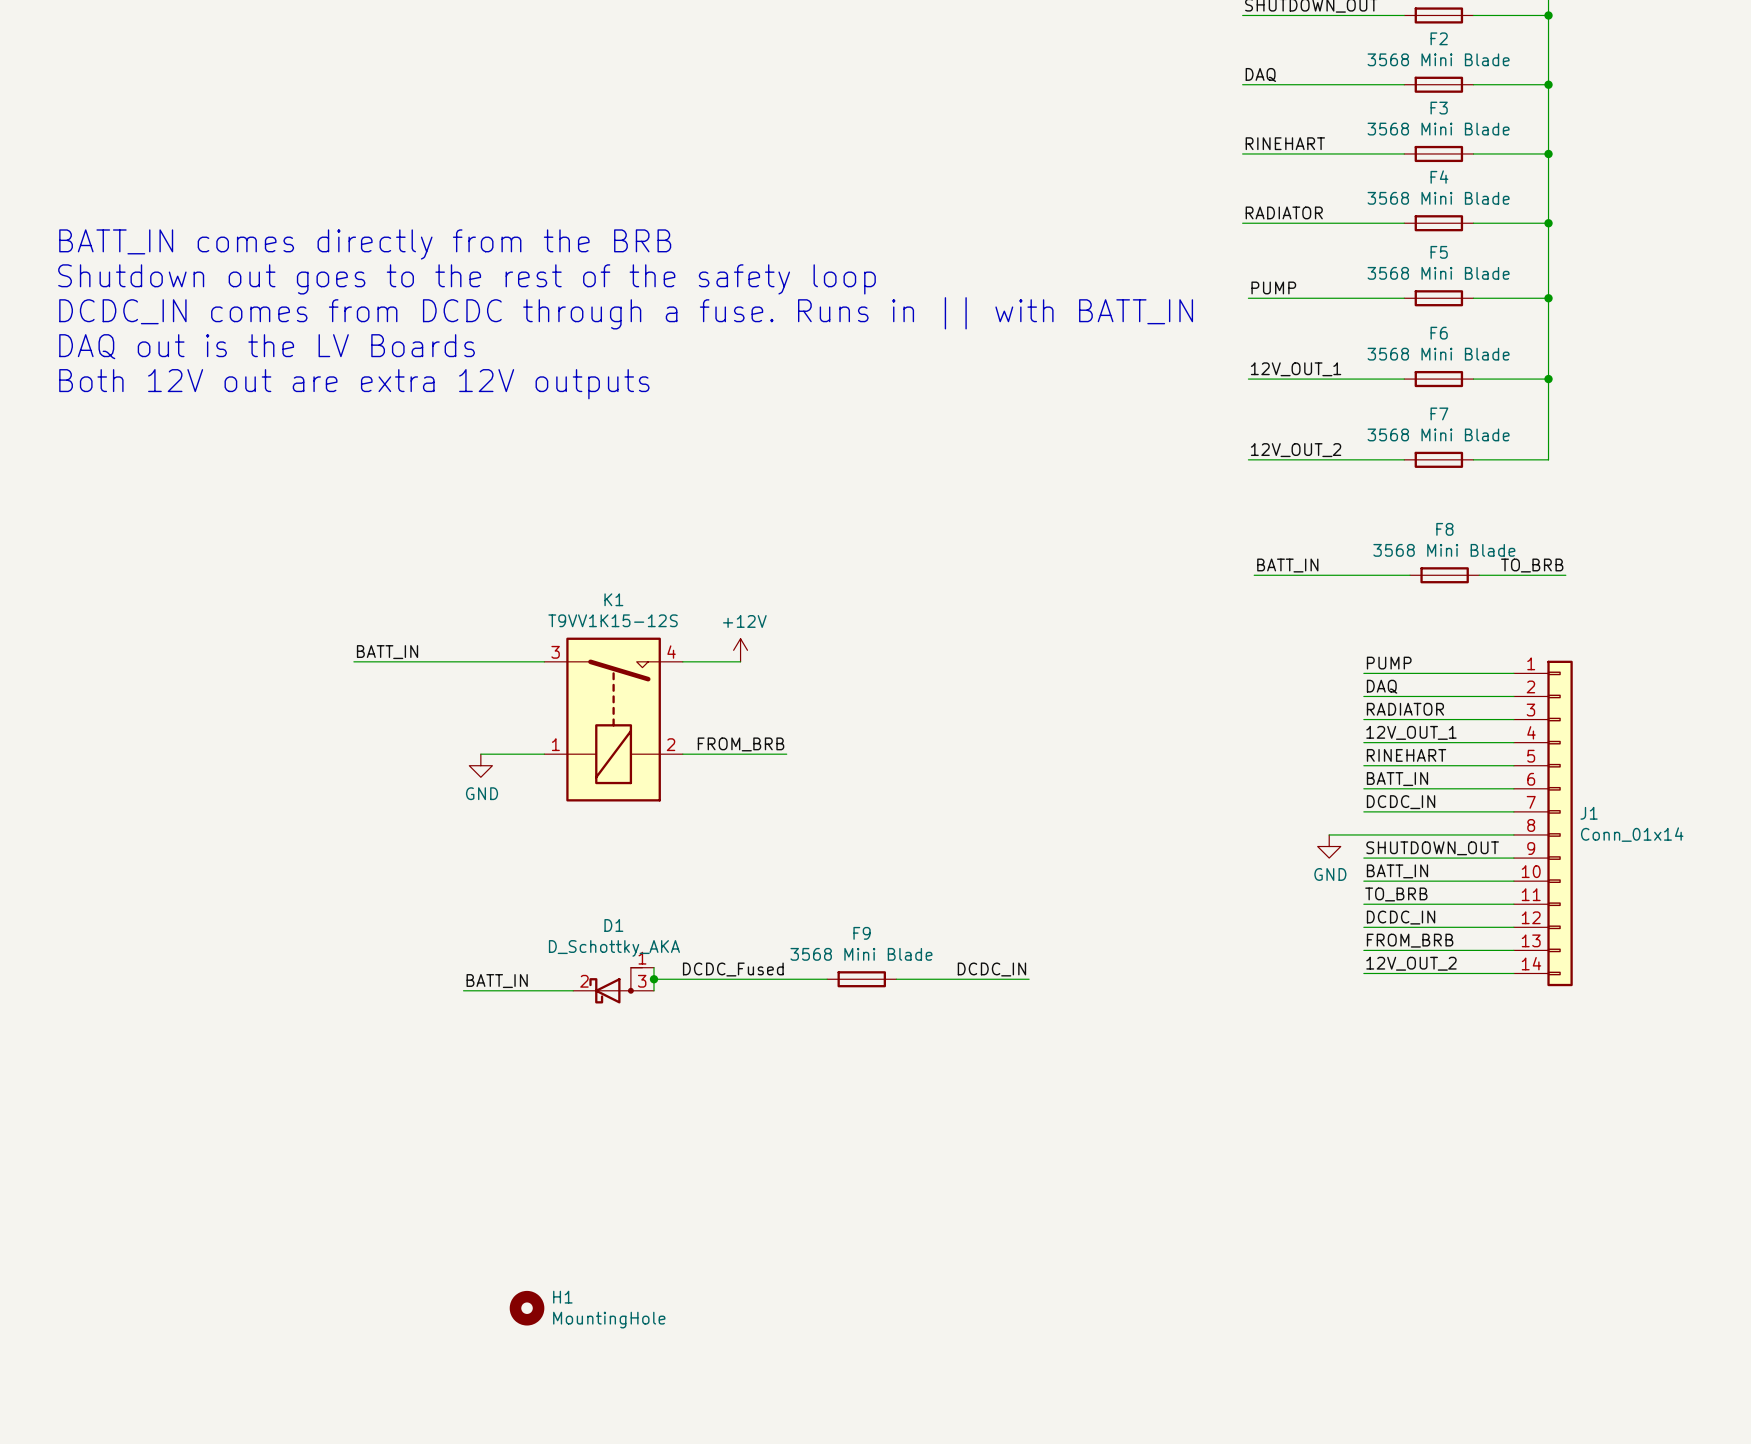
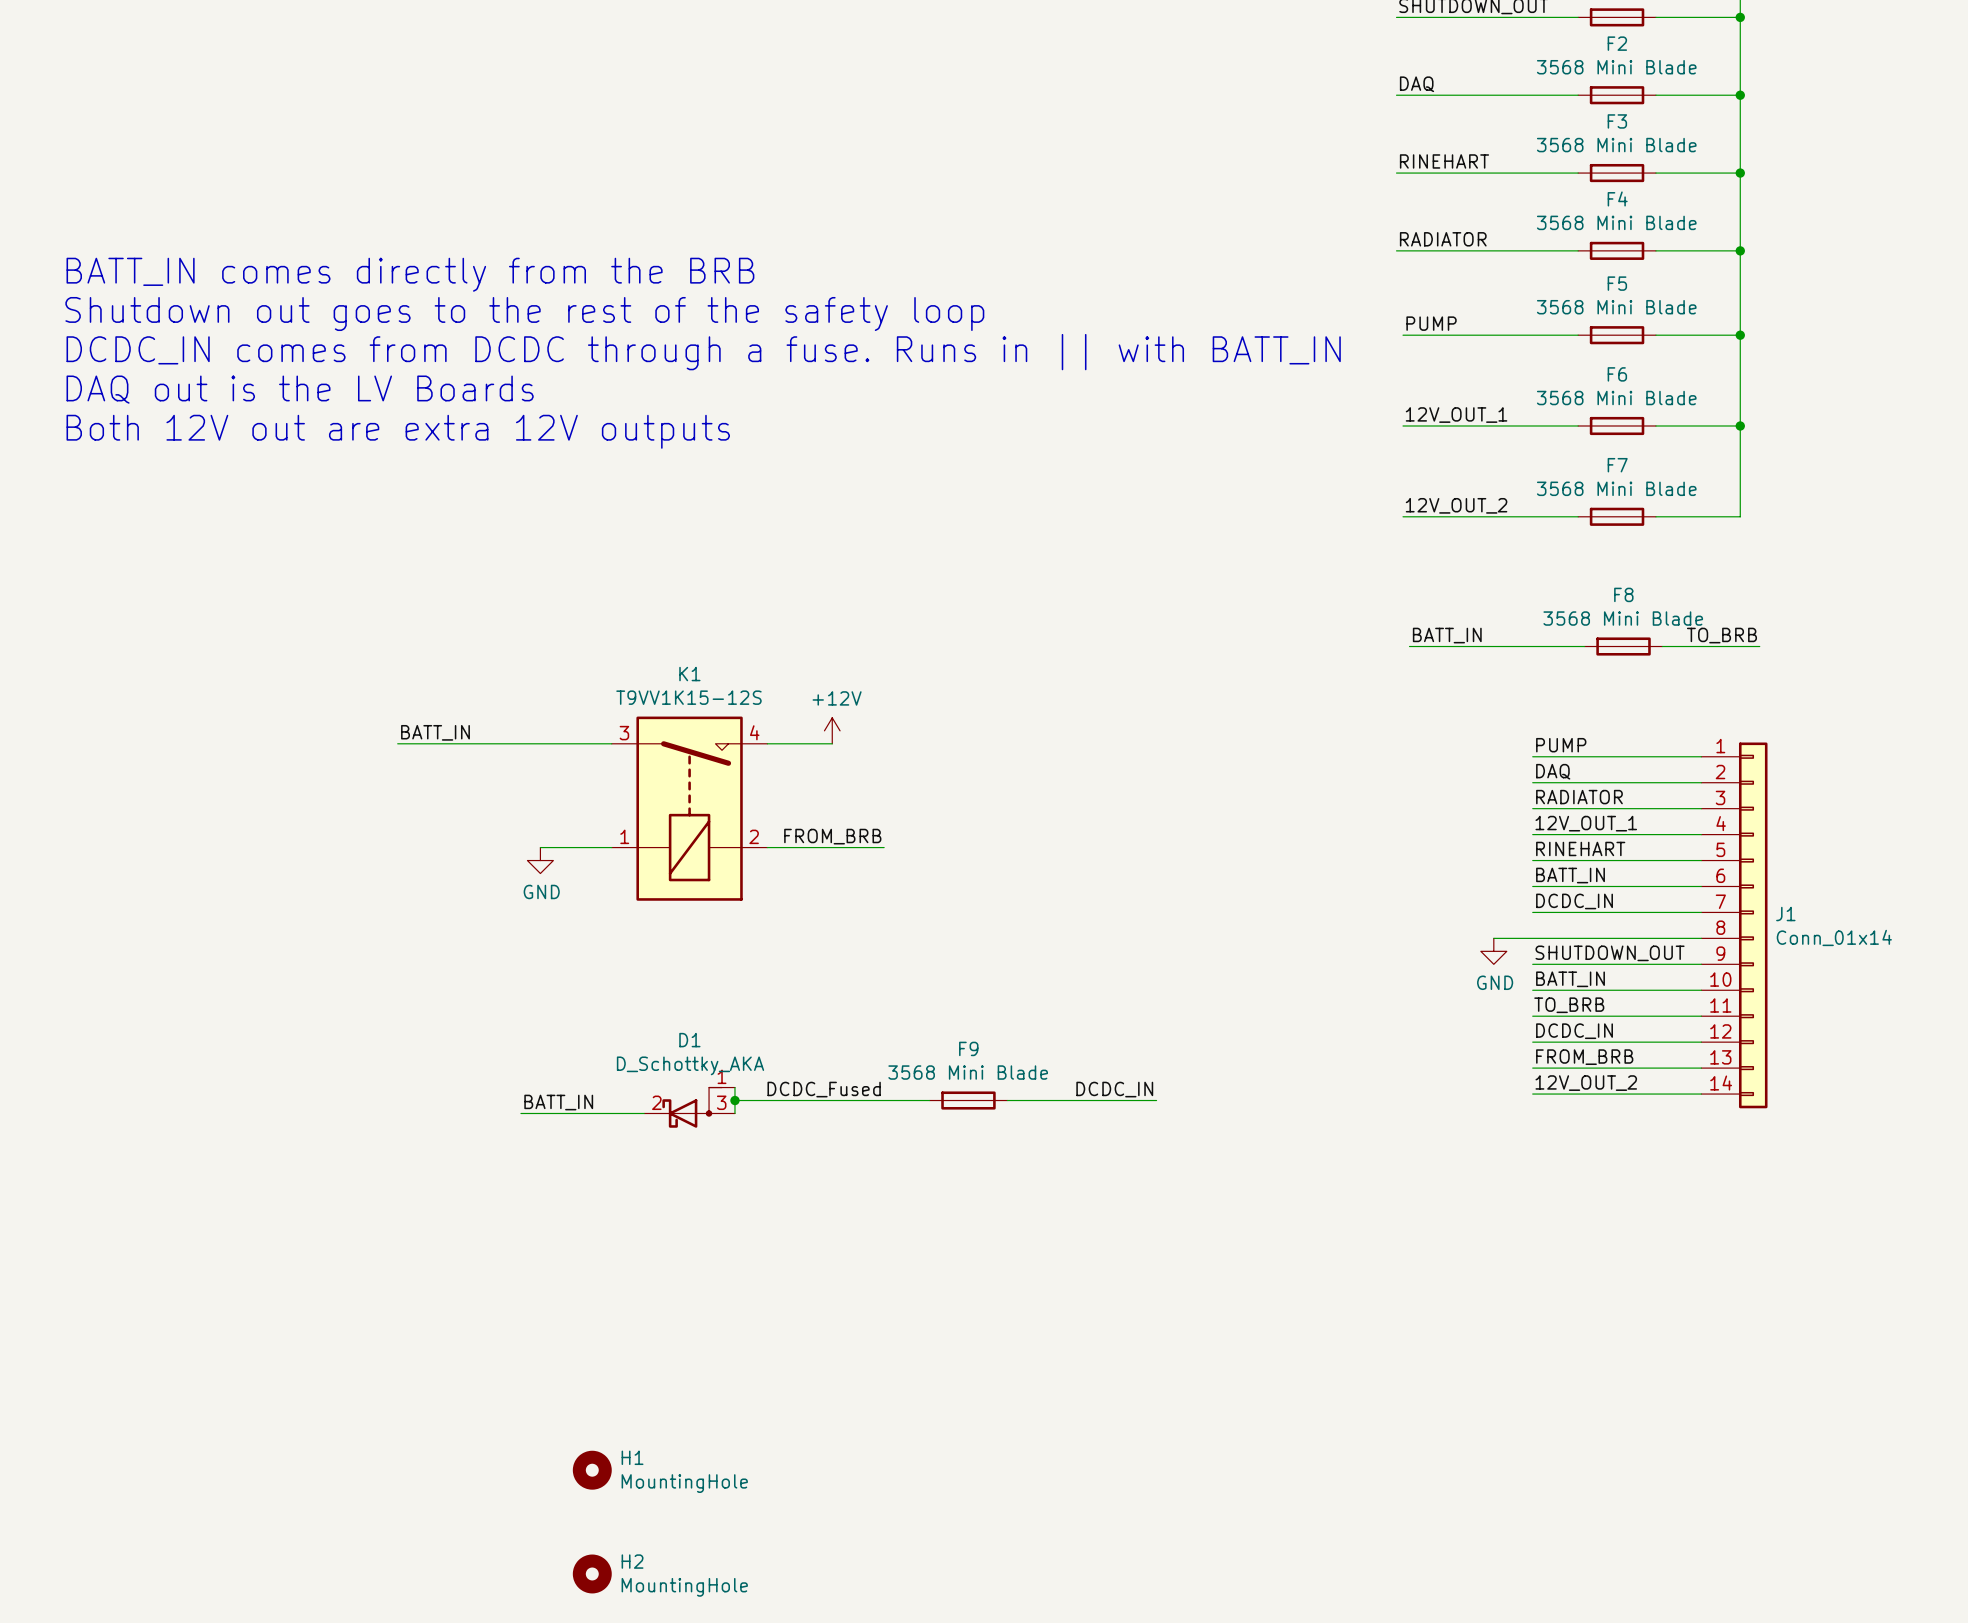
H2: none -> MountingHole (592, 1573)

